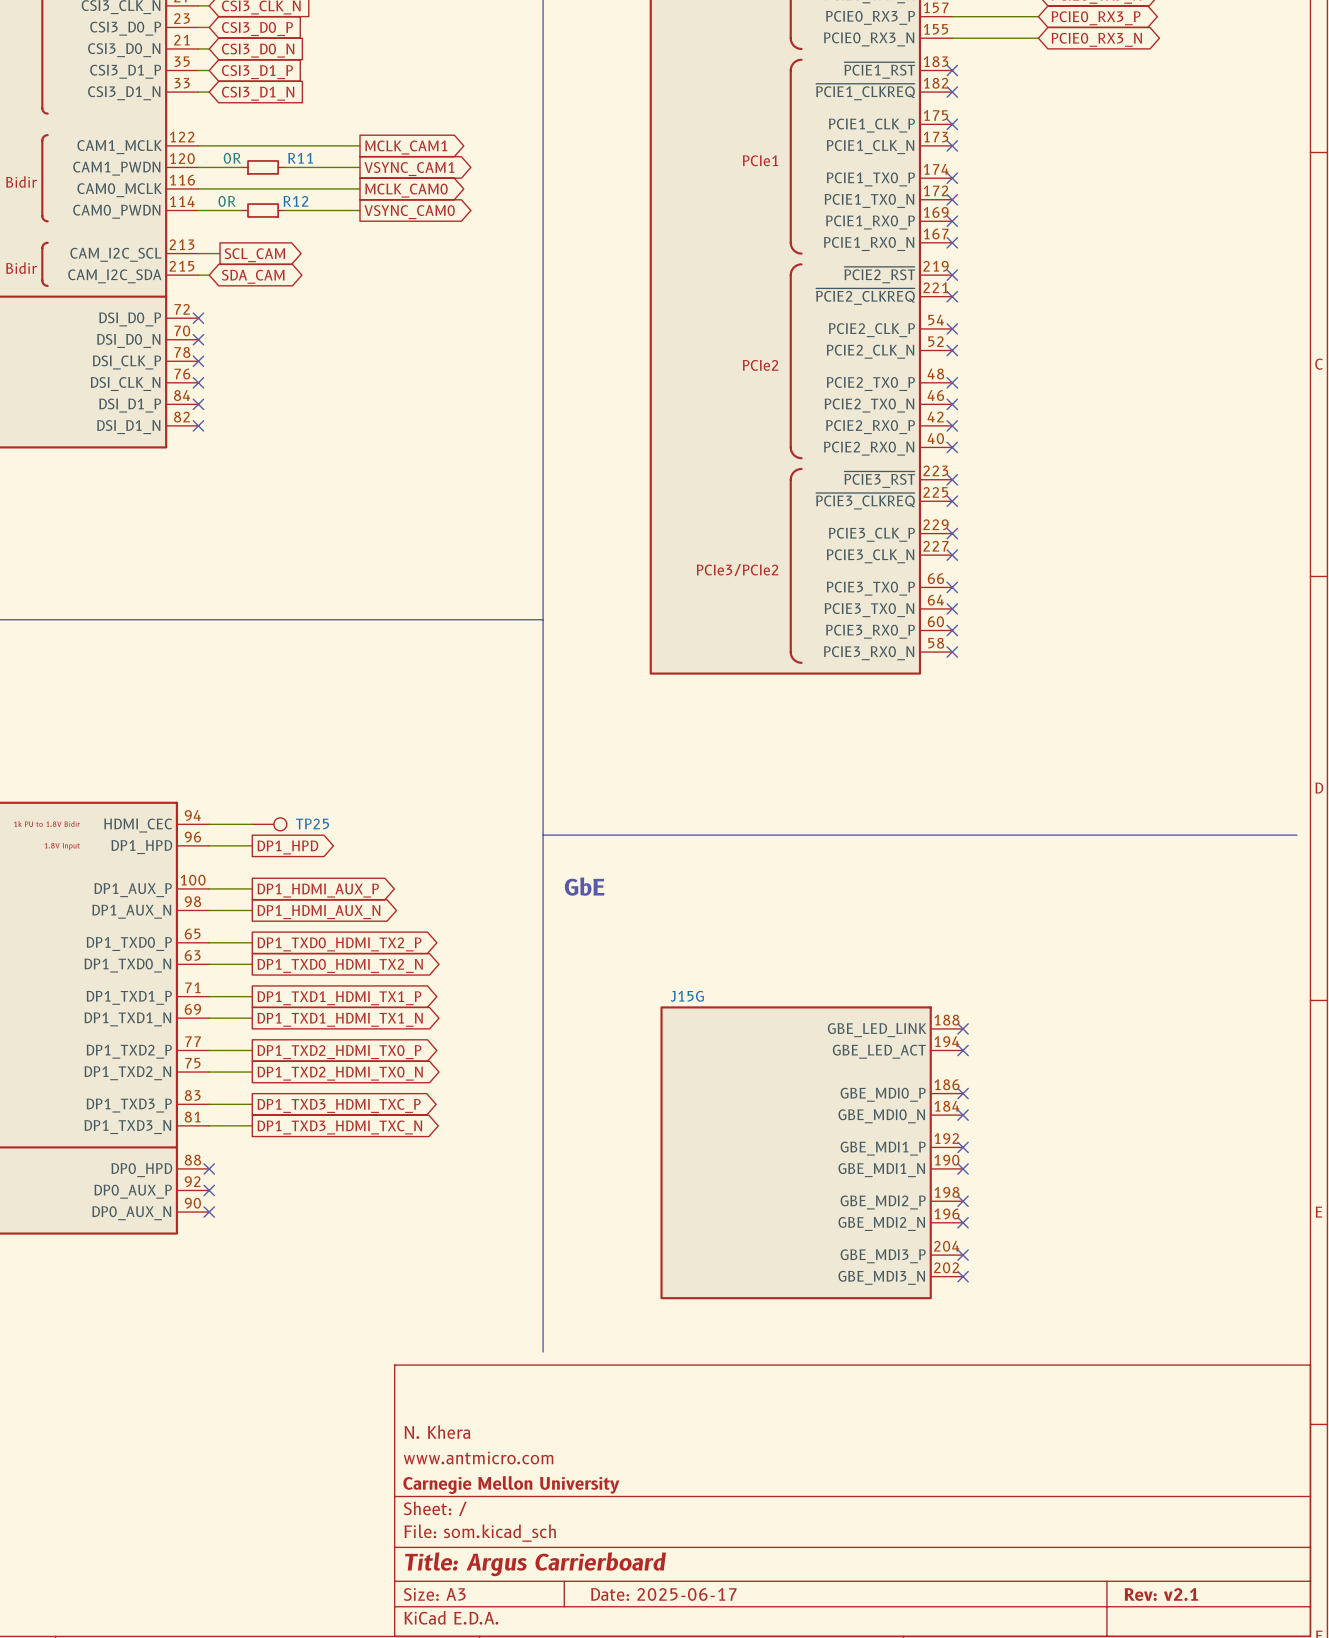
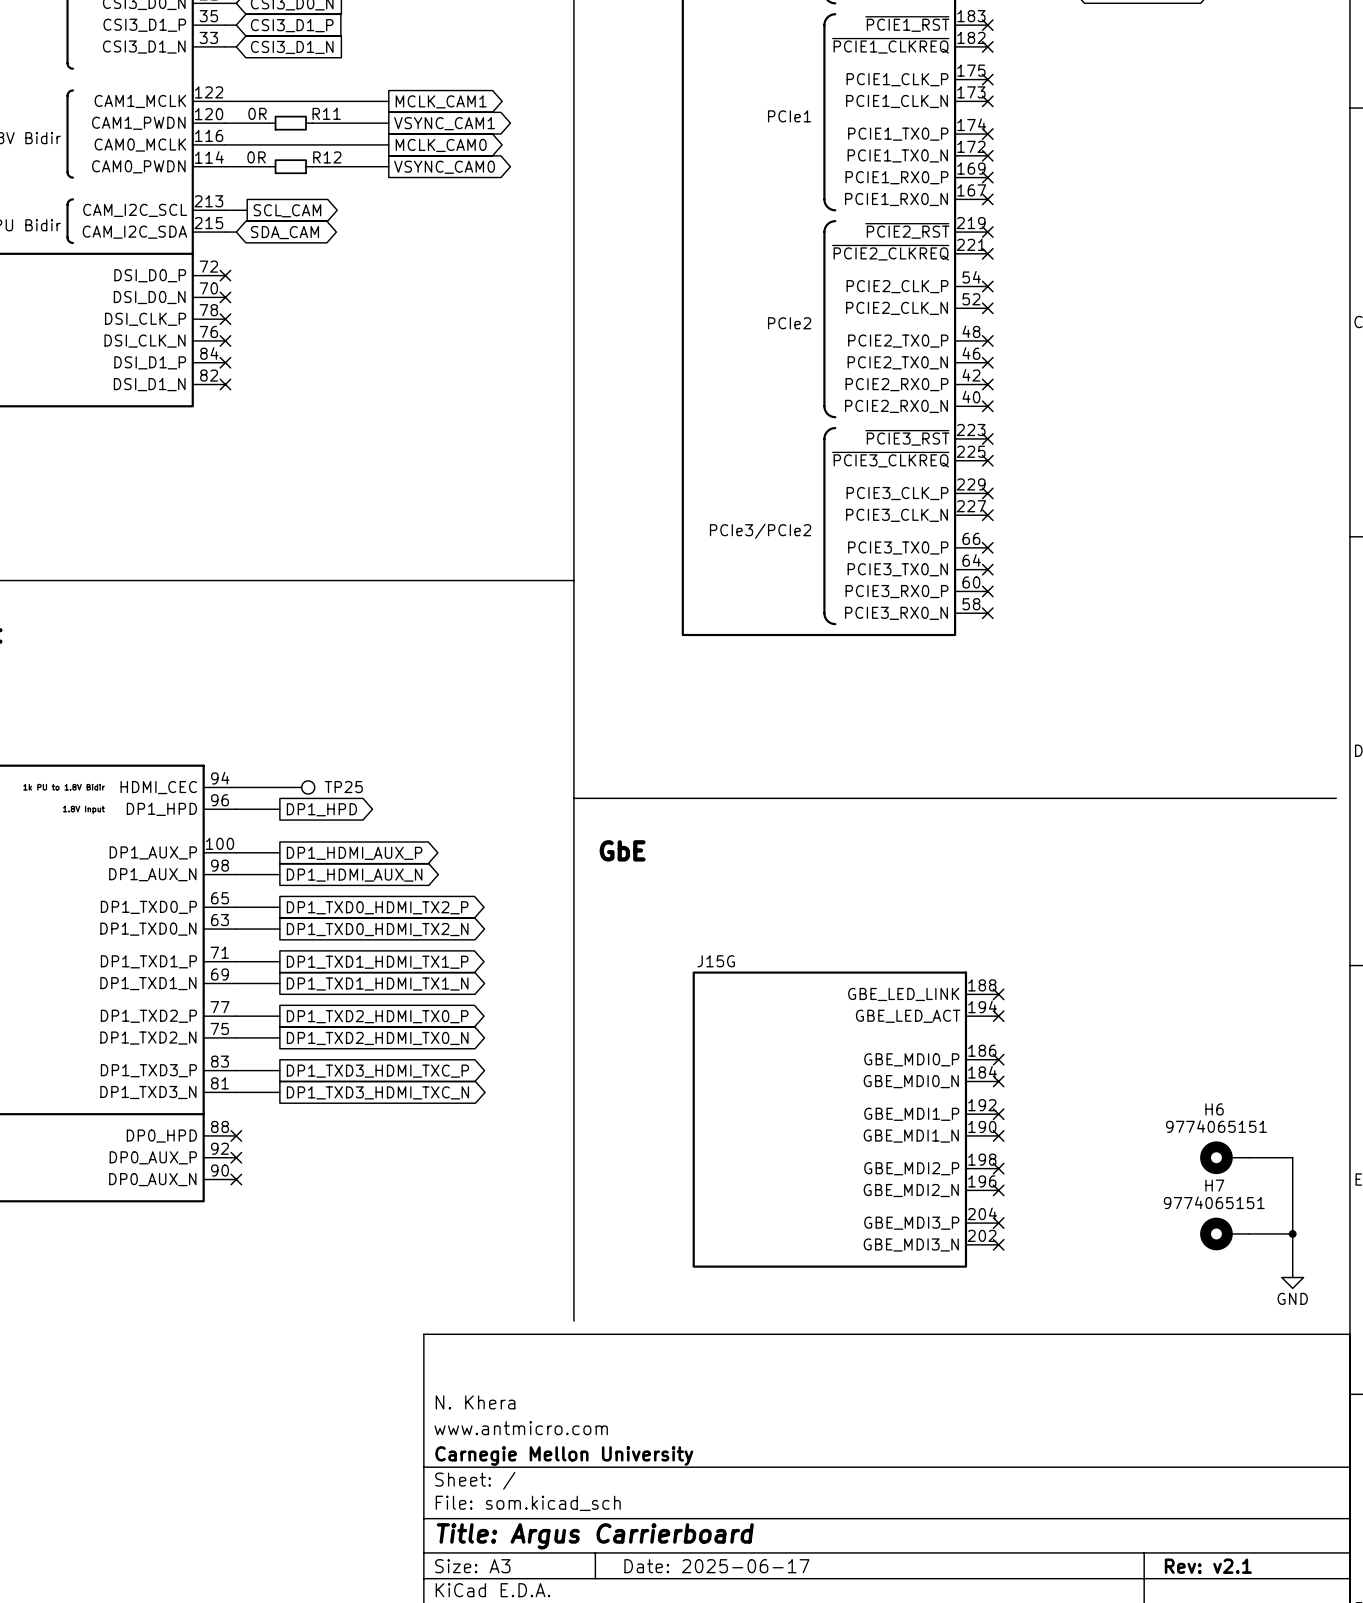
H6: none -> 9774065151 (1224, 1157)
wire: none -> (1249, 1157) (1292, 1157) (1292, 1266)
H7: none -> 9774065151 (1224, 1233)
wire: none -> (1249, 1233) (1292, 1233)
junction: none -> (1292, 1233)
power symbol: none -> GND (1292, 1277)

